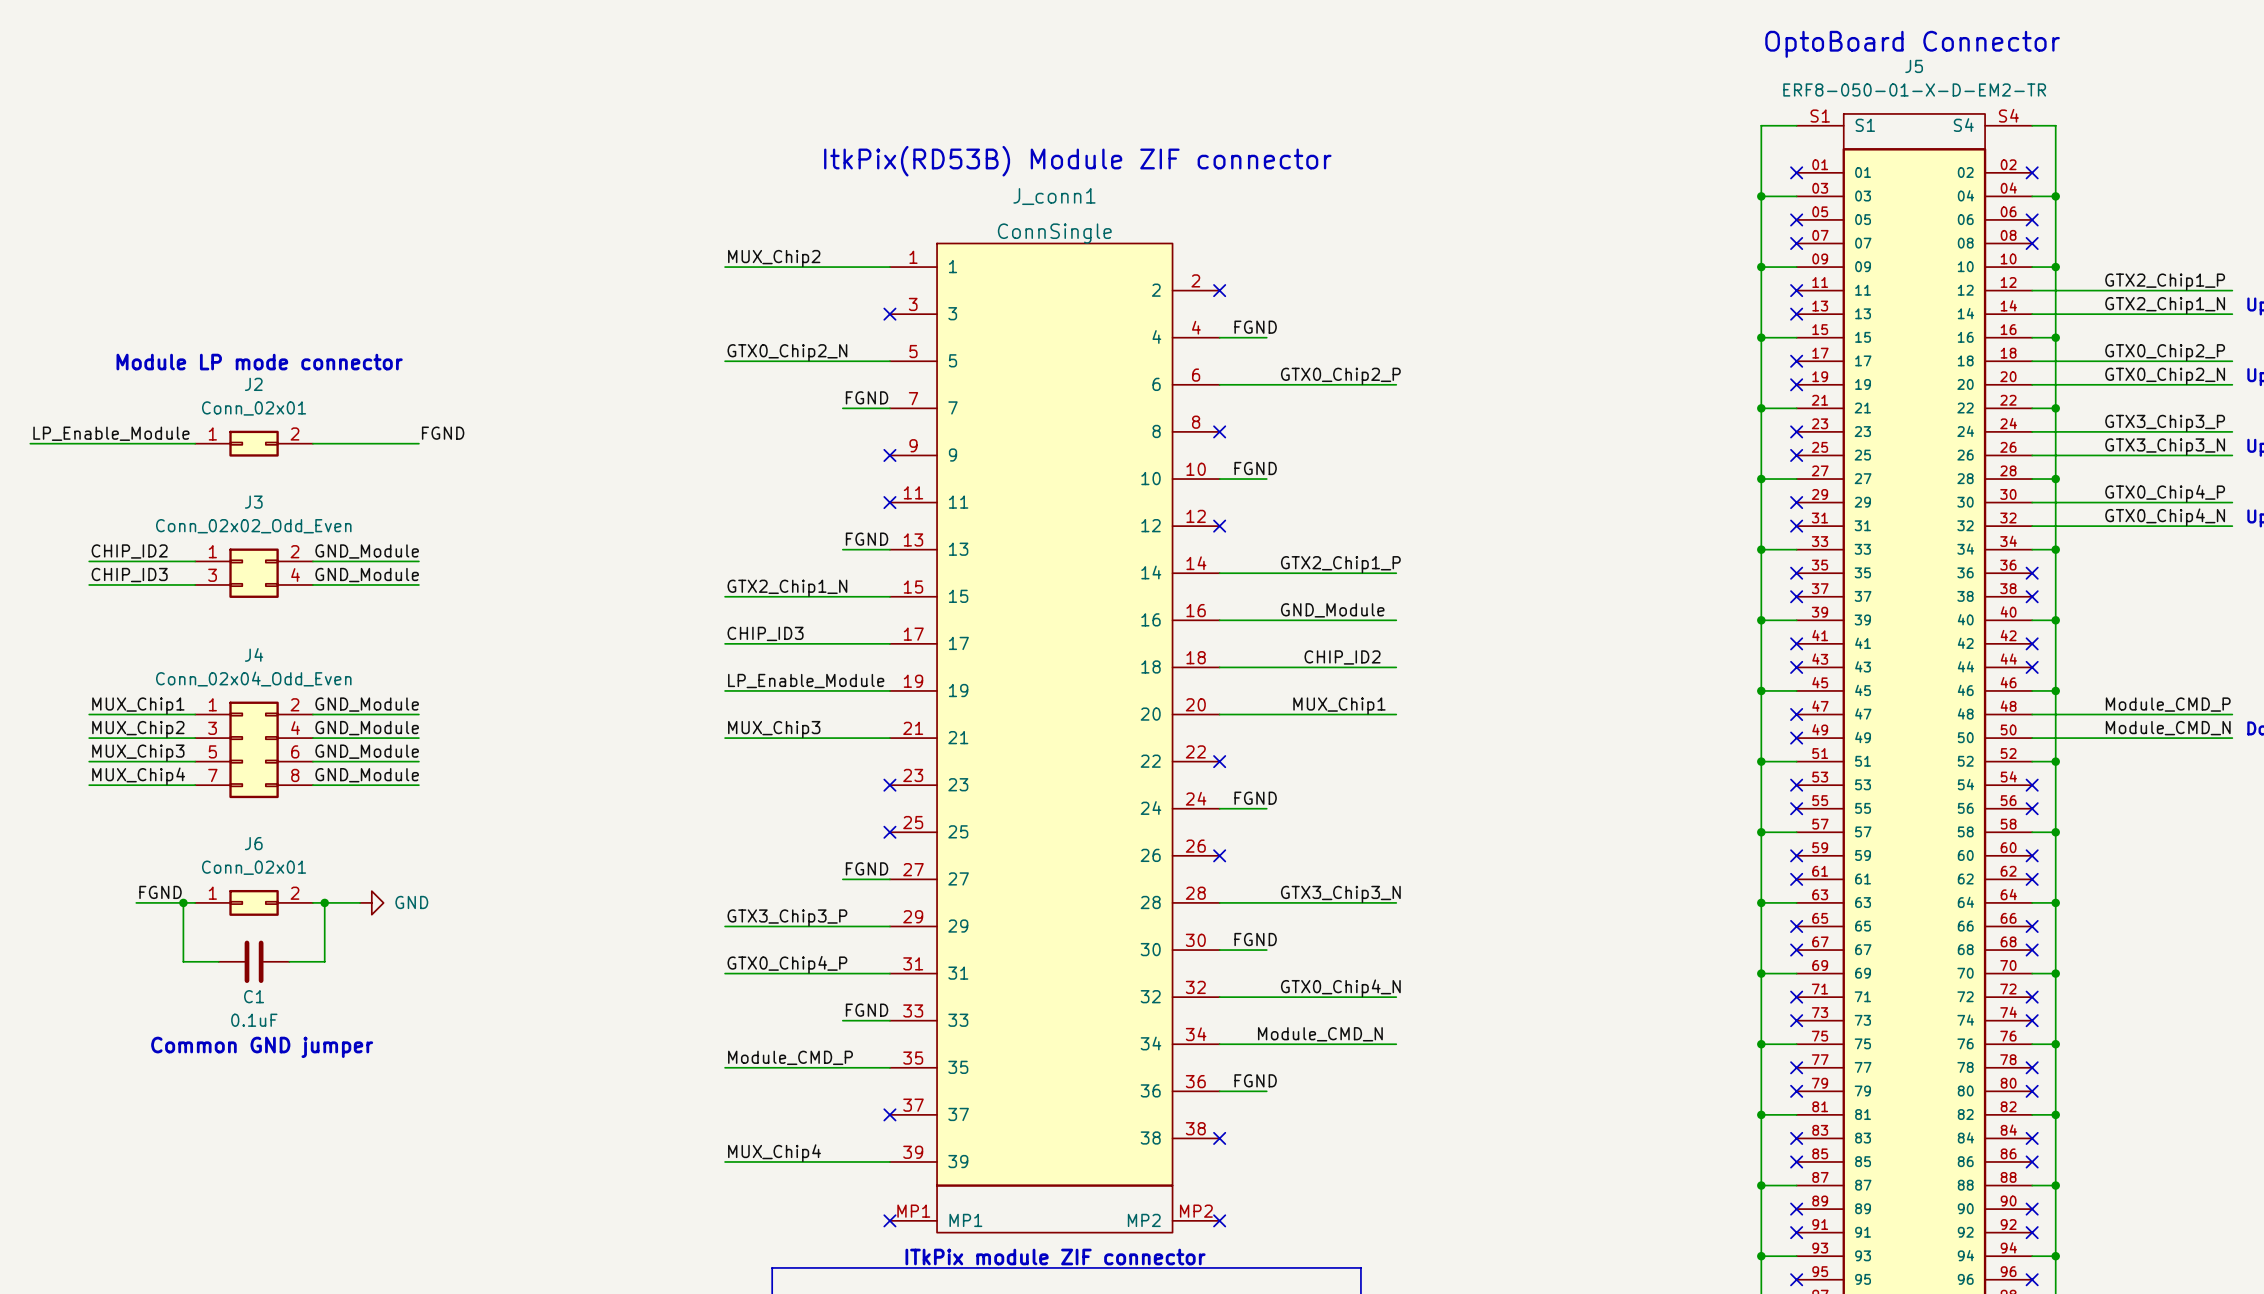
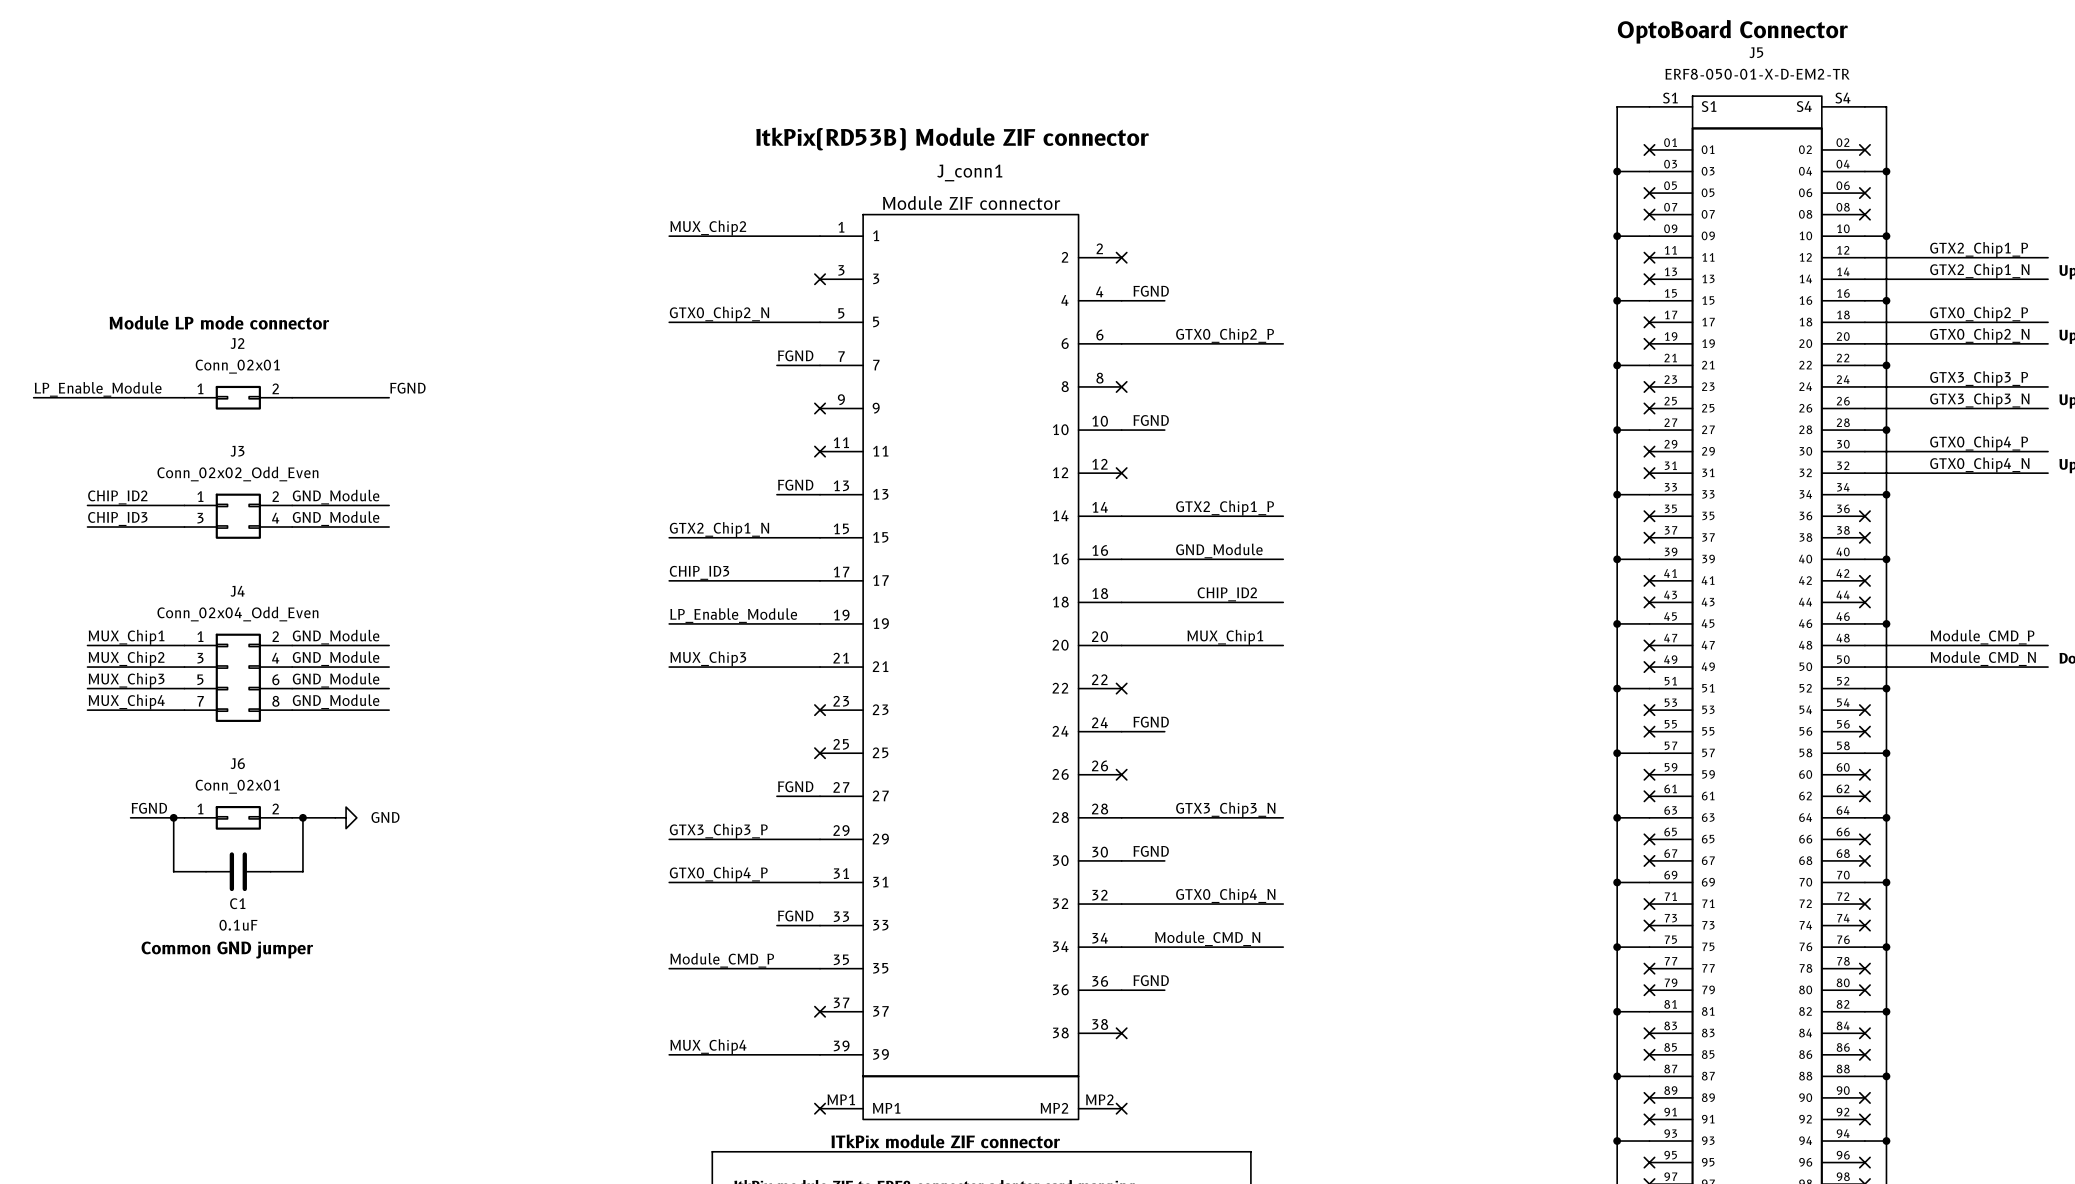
J_conn1 value: ConnSingle (1054, 233) -> Module ZIF connector (971, 203)

